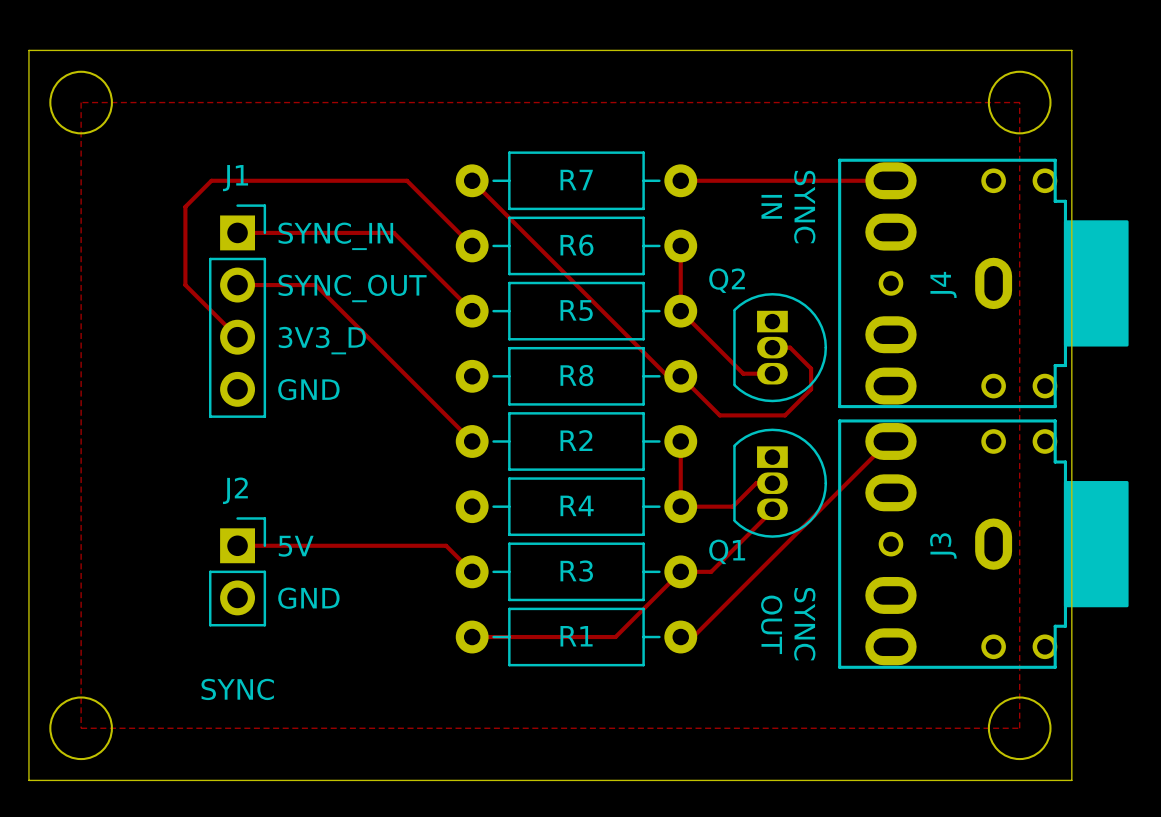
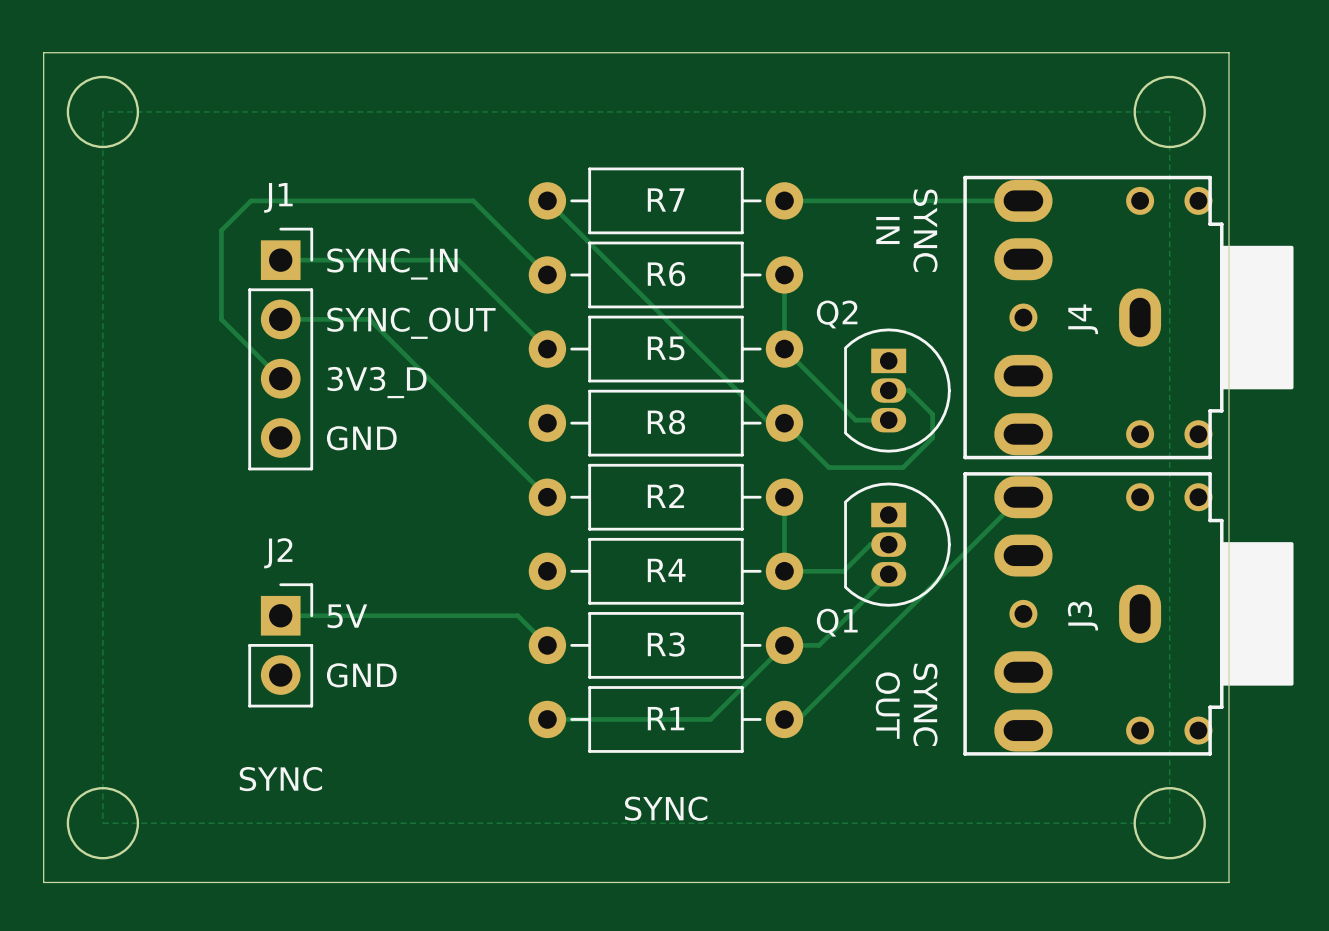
text: none -> SYNC (666, 808)

